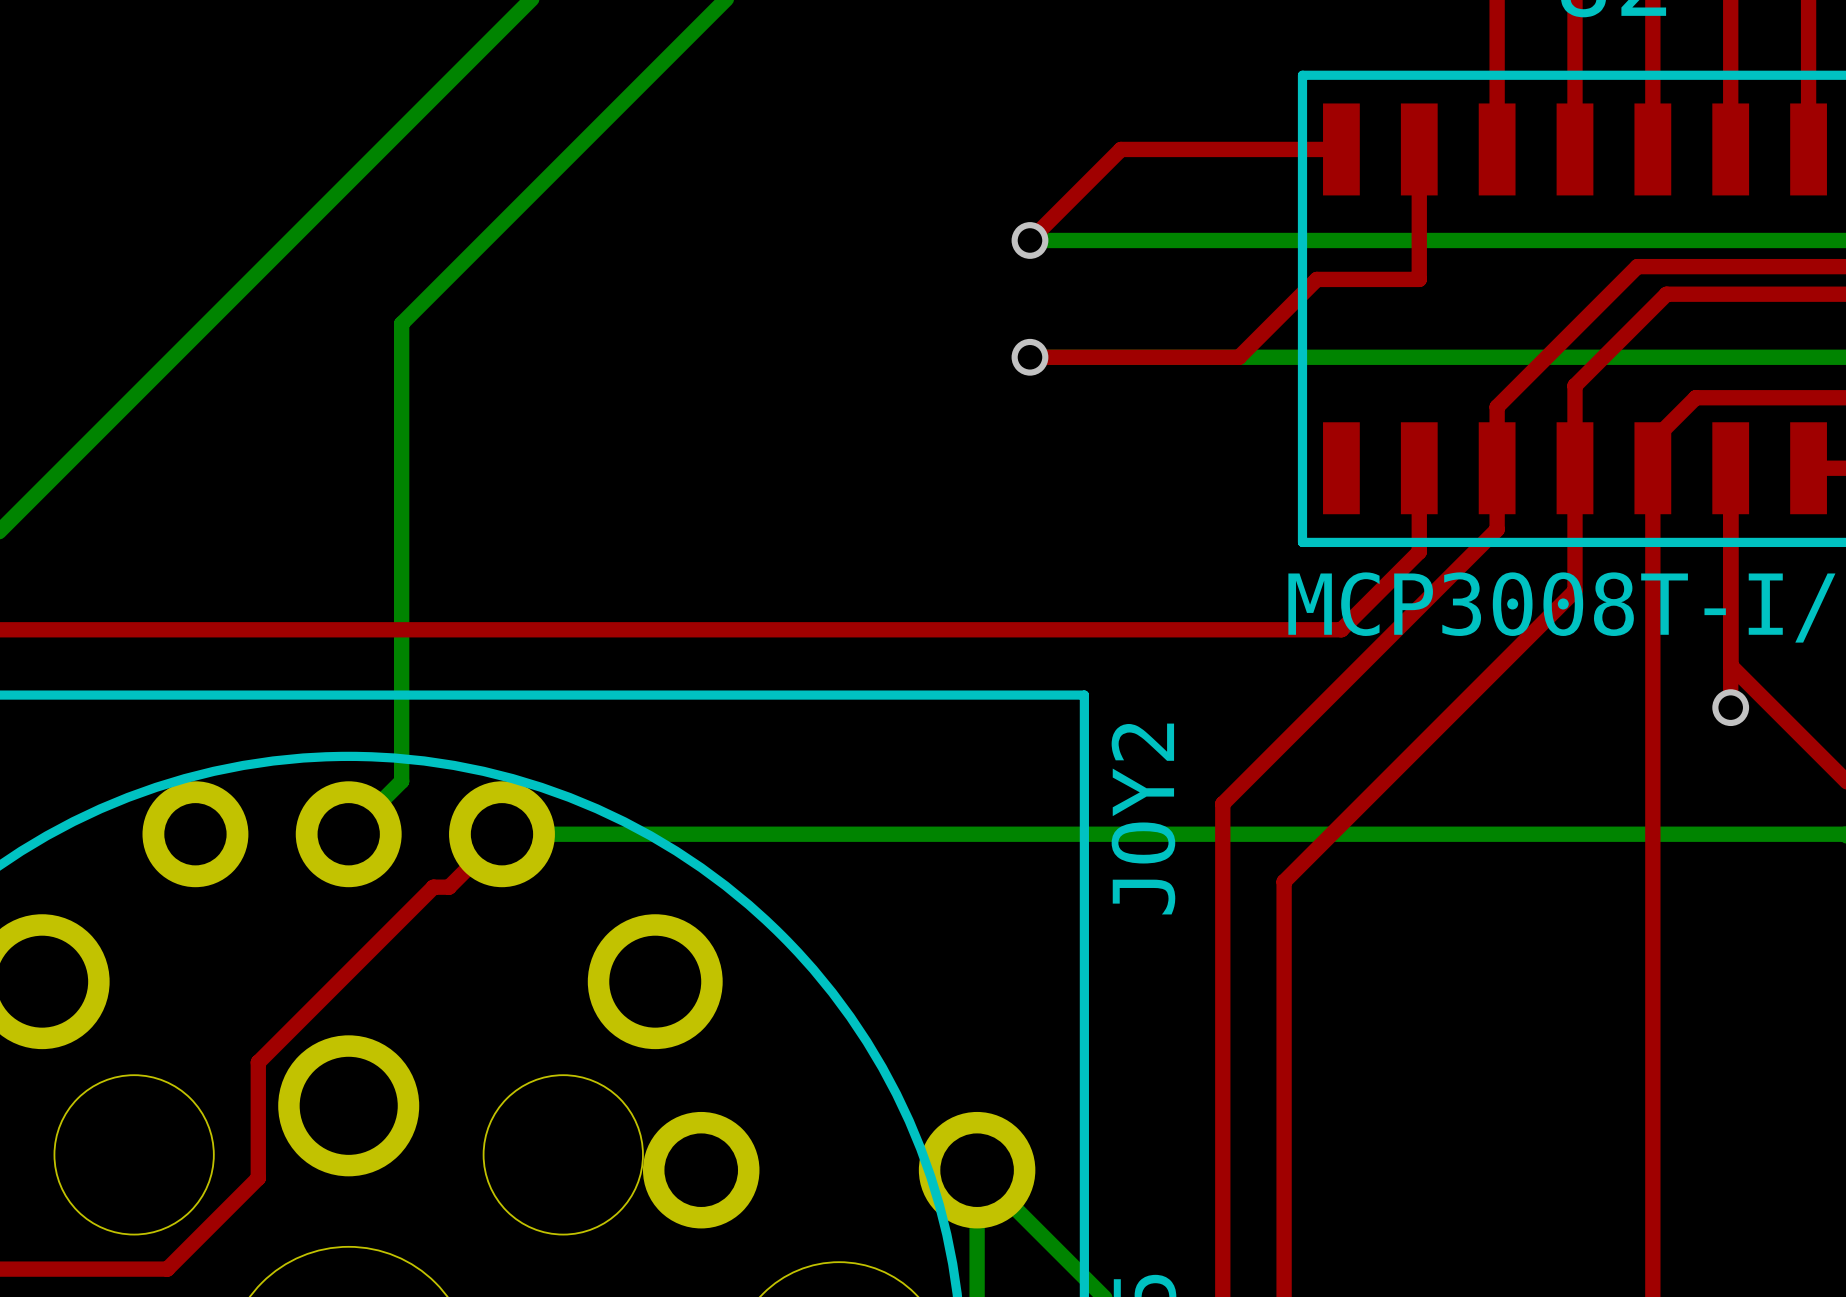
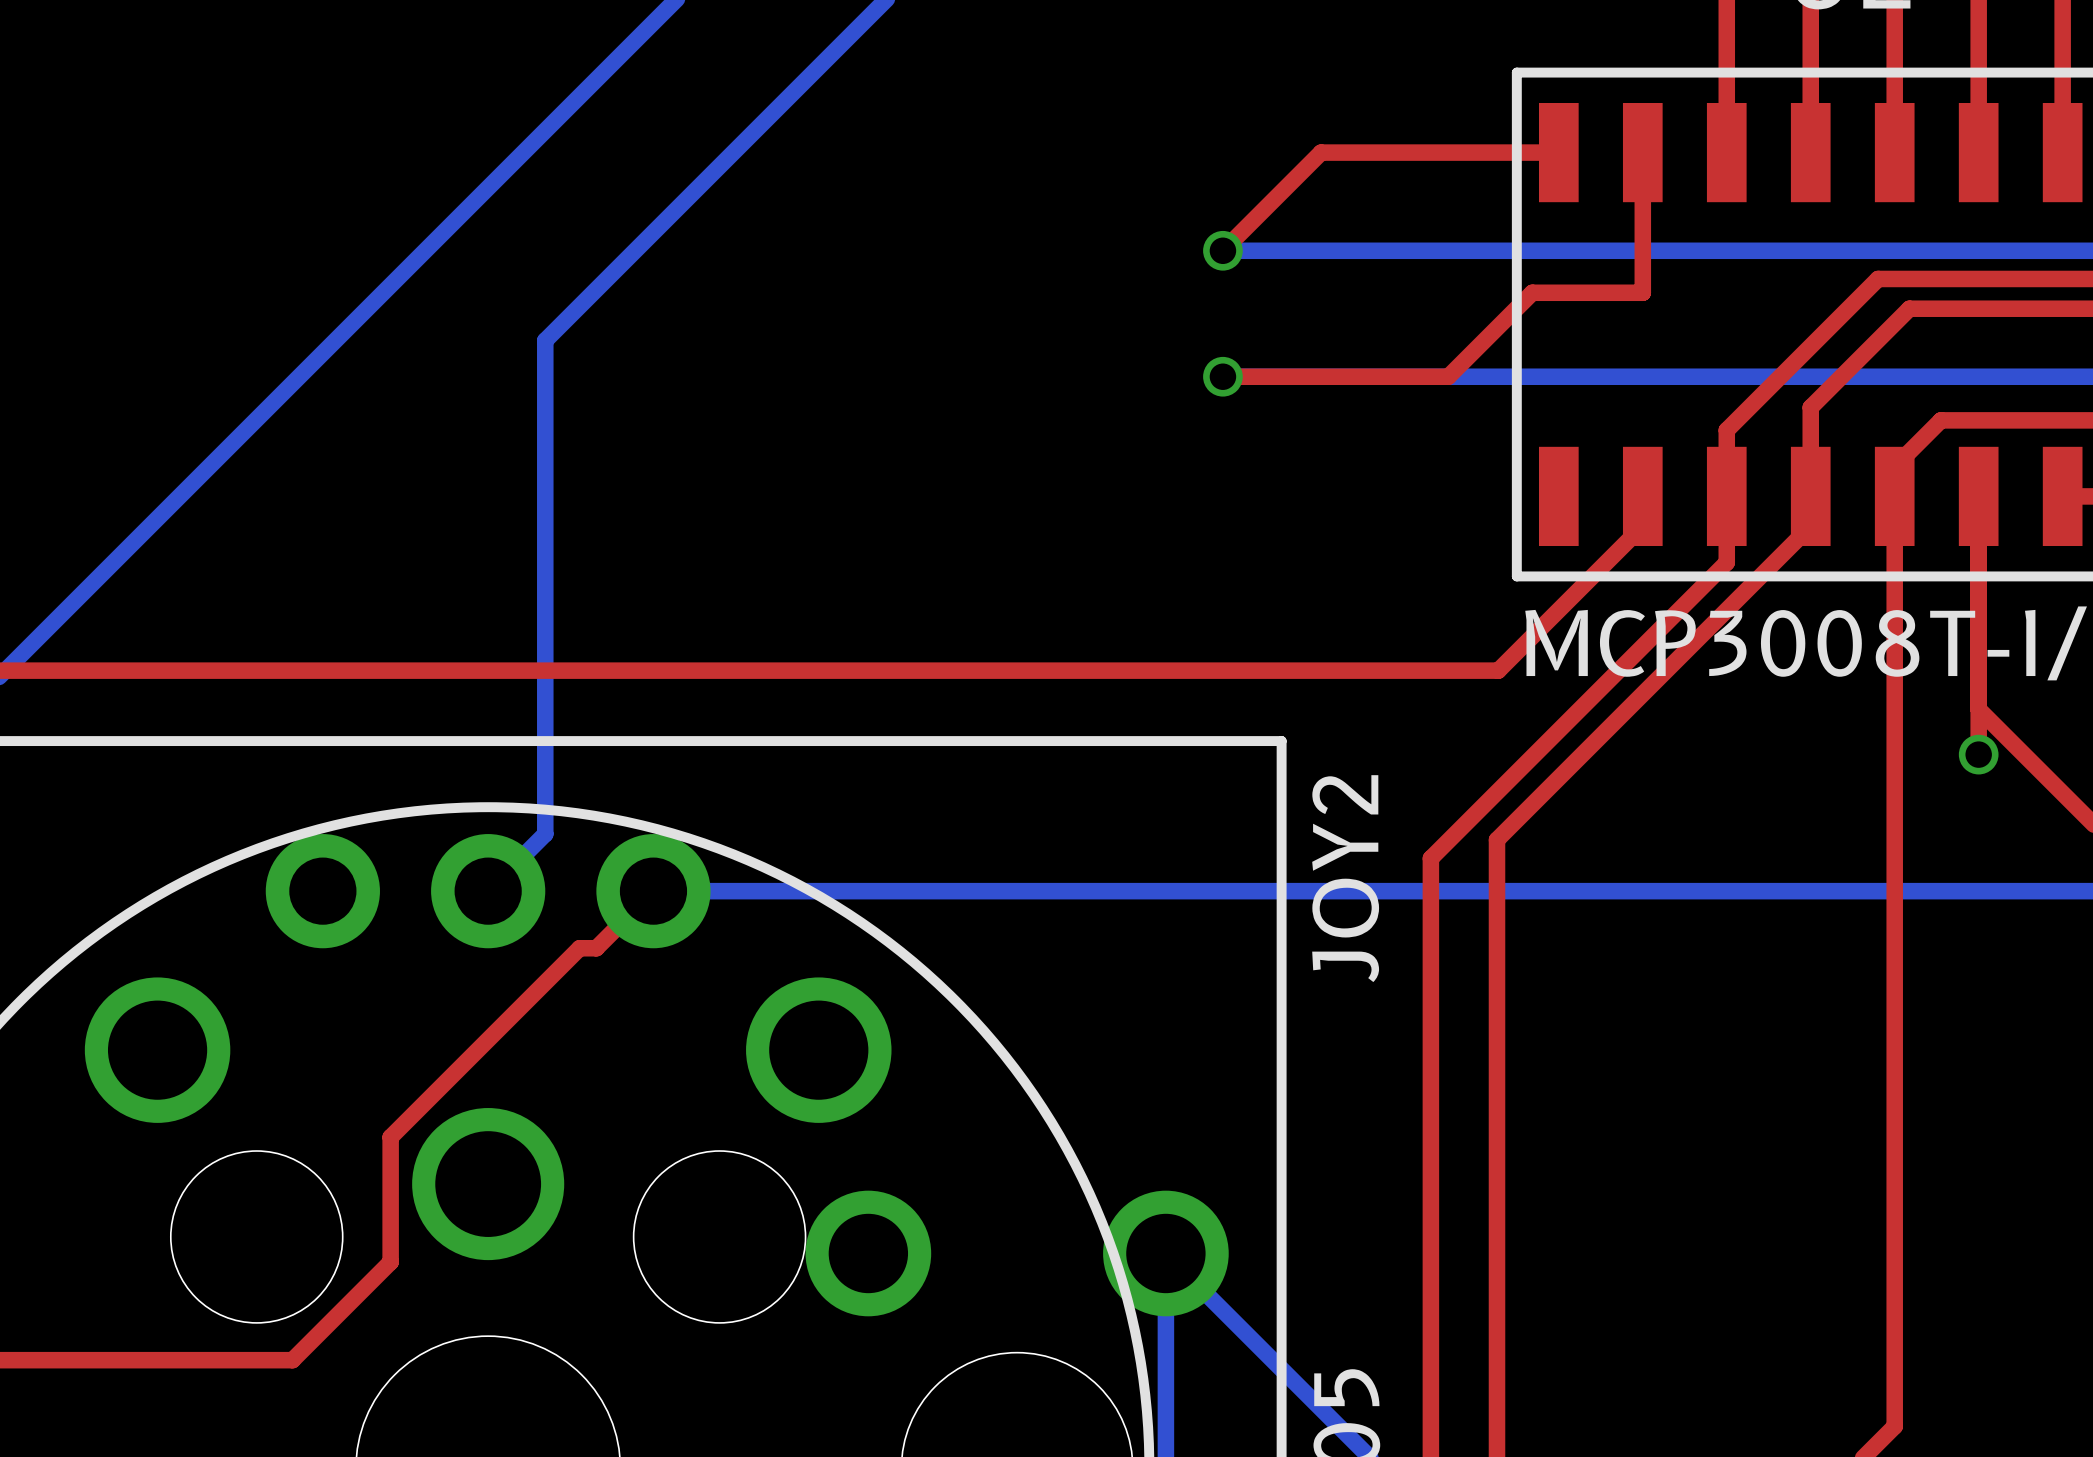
top track: (1419, 495) (1419, 551) (1341, 629) (1285, 629) -> (1642, 526) (1498, 670)
top track: (1574, 495) (1574, 590) (1284, 881) -> (1810, 526) (1497, 839) (1497, 942)

